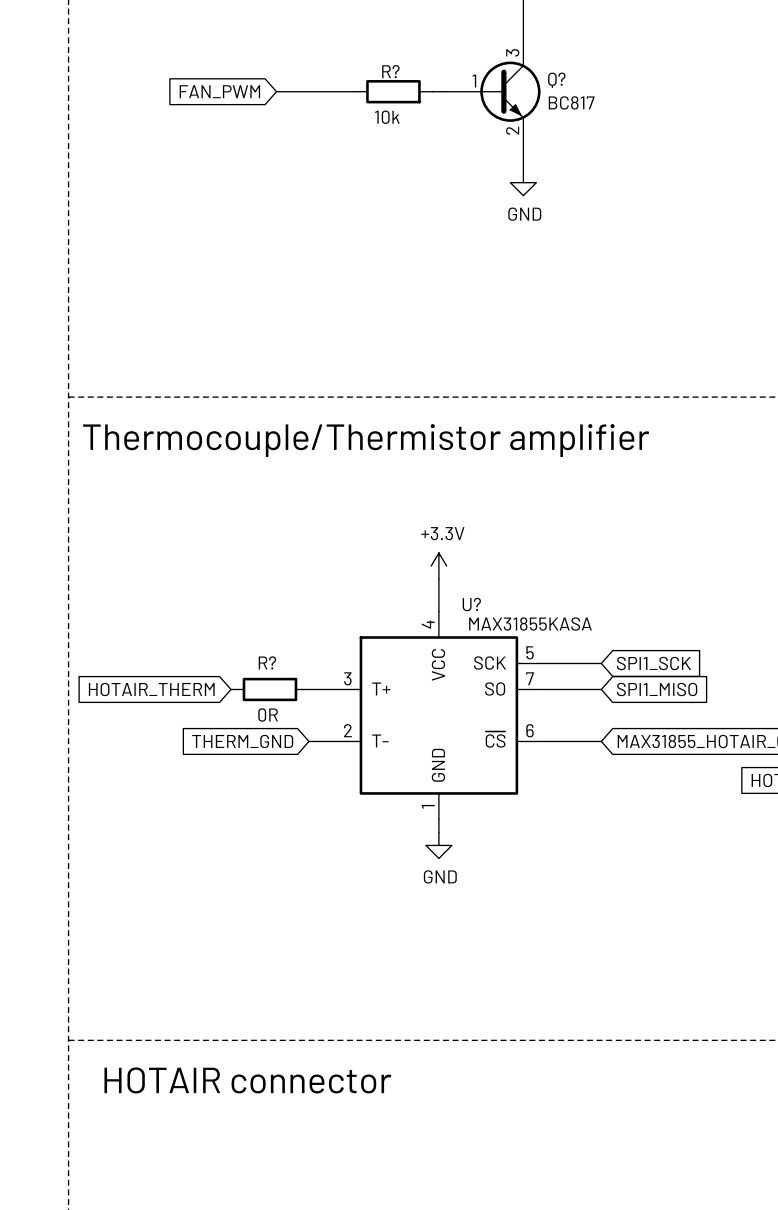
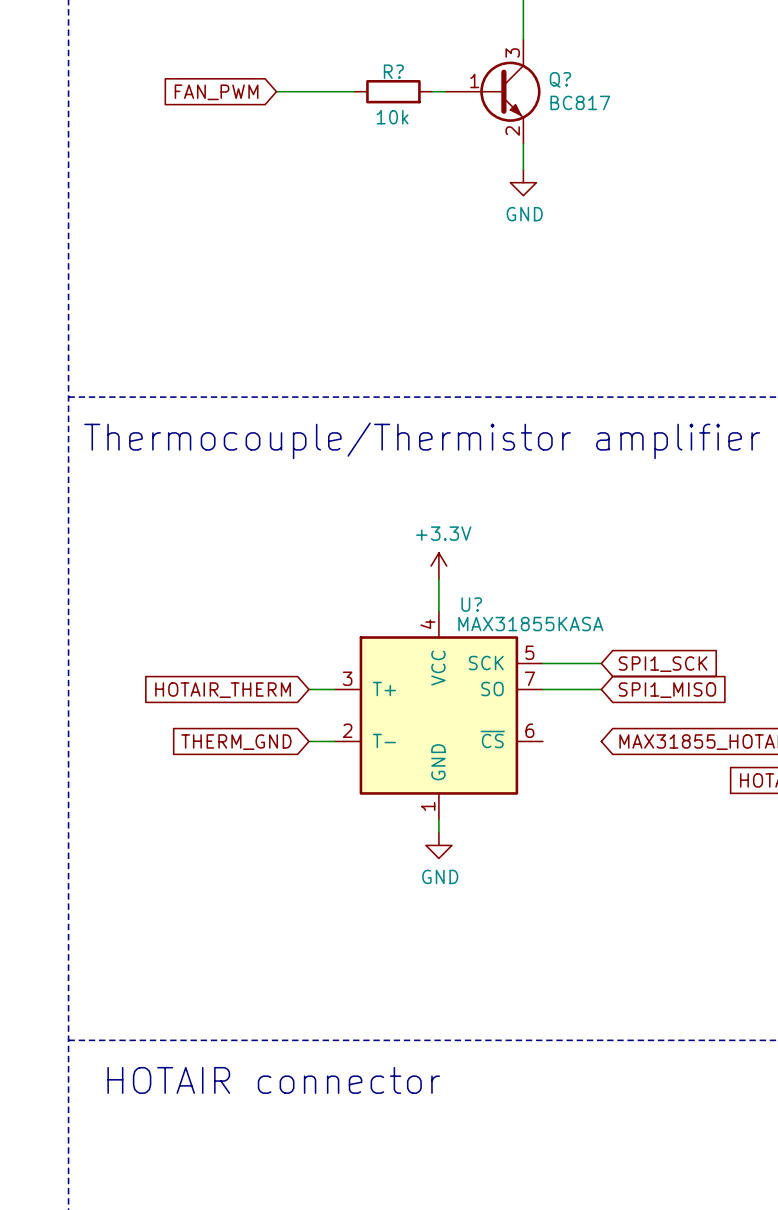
global label position: HOTAIR_THERM (151, 689) -> HOTAIR_THERM (223, 690)
R?: 0R (269, 689) -> none
wire: (542, 741) (601, 741) -> none

